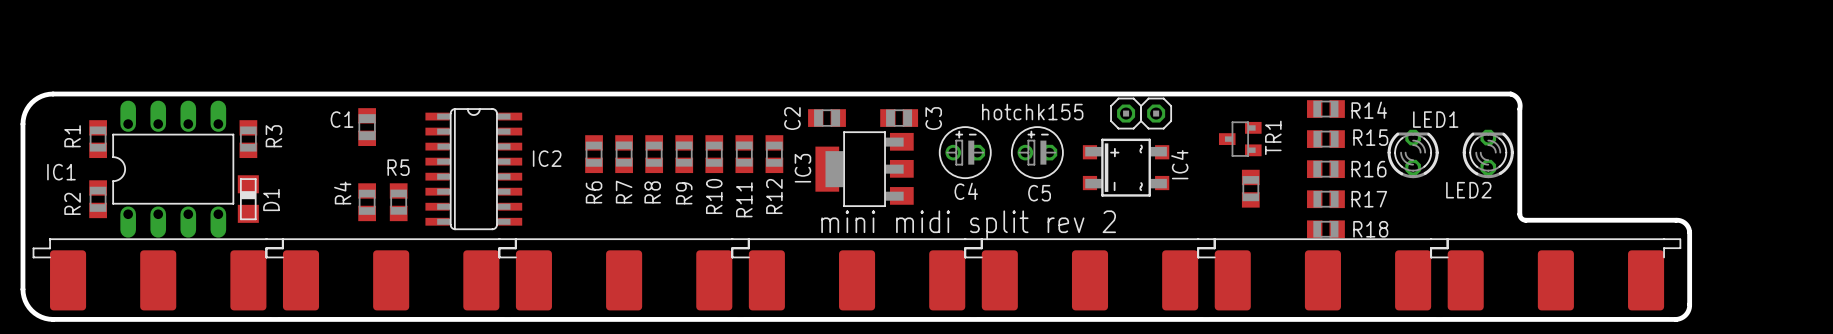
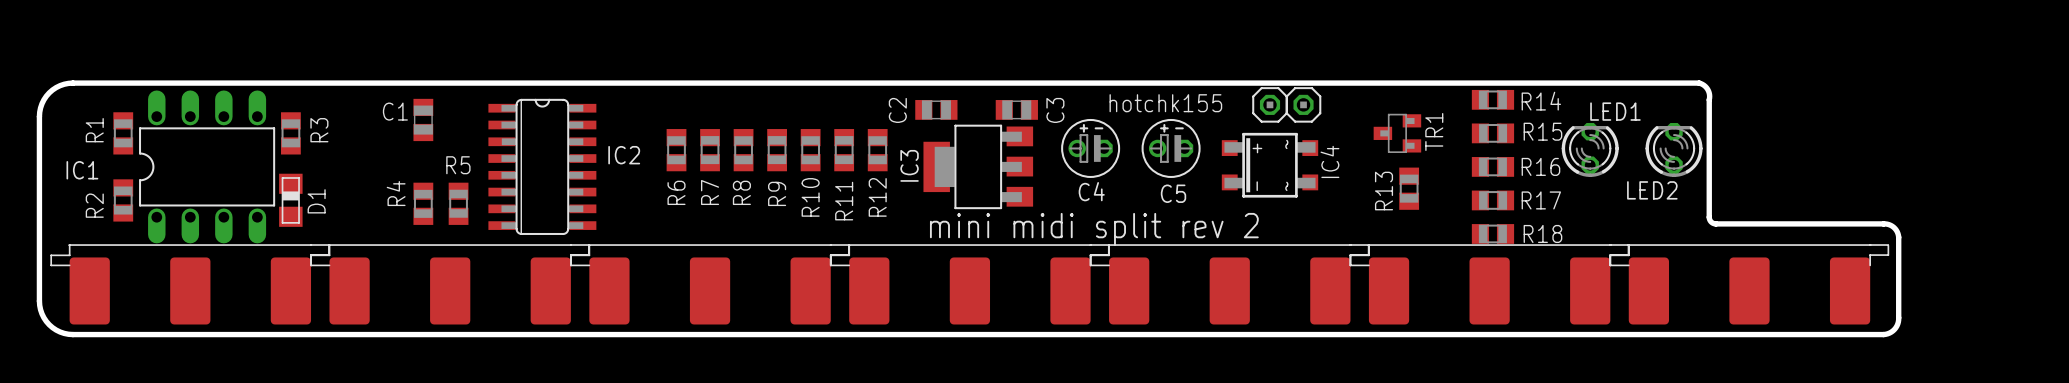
R13 name: none -> R13 (1384, 191)

